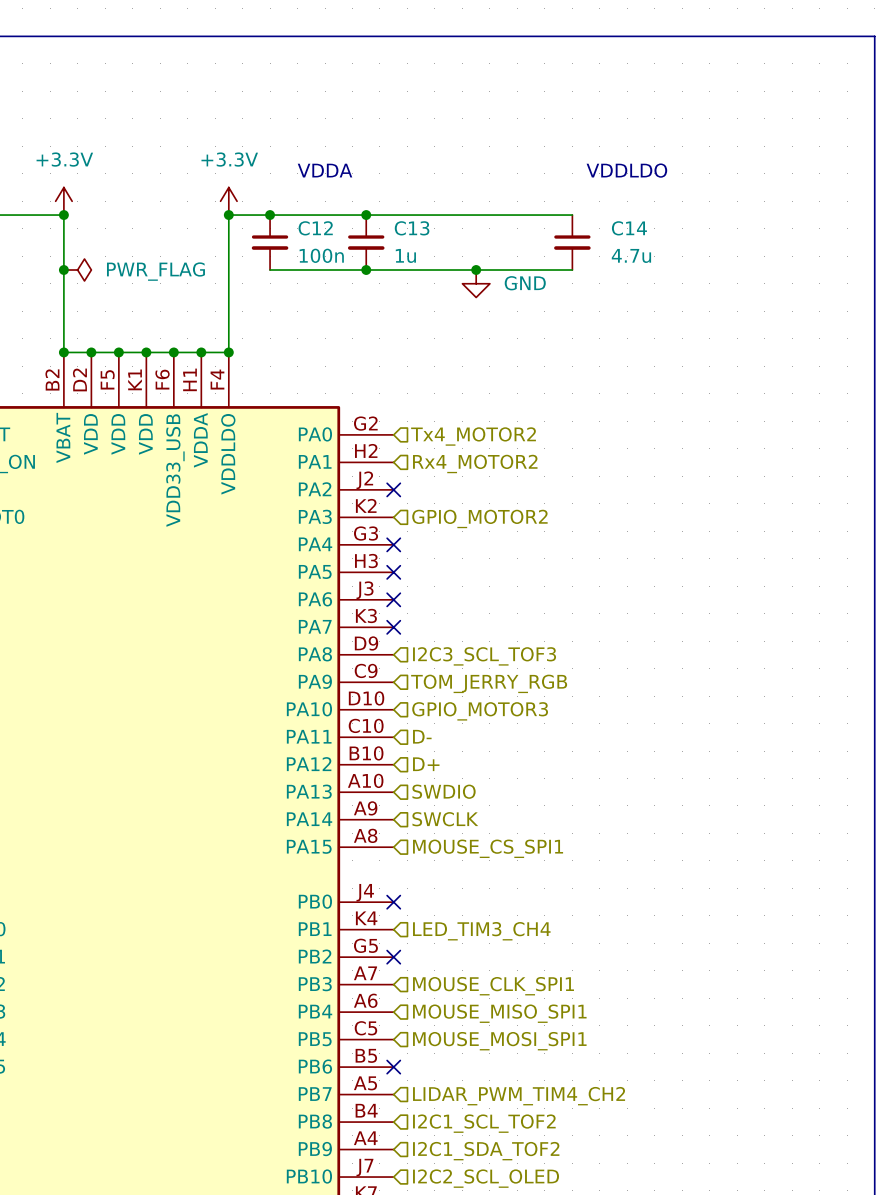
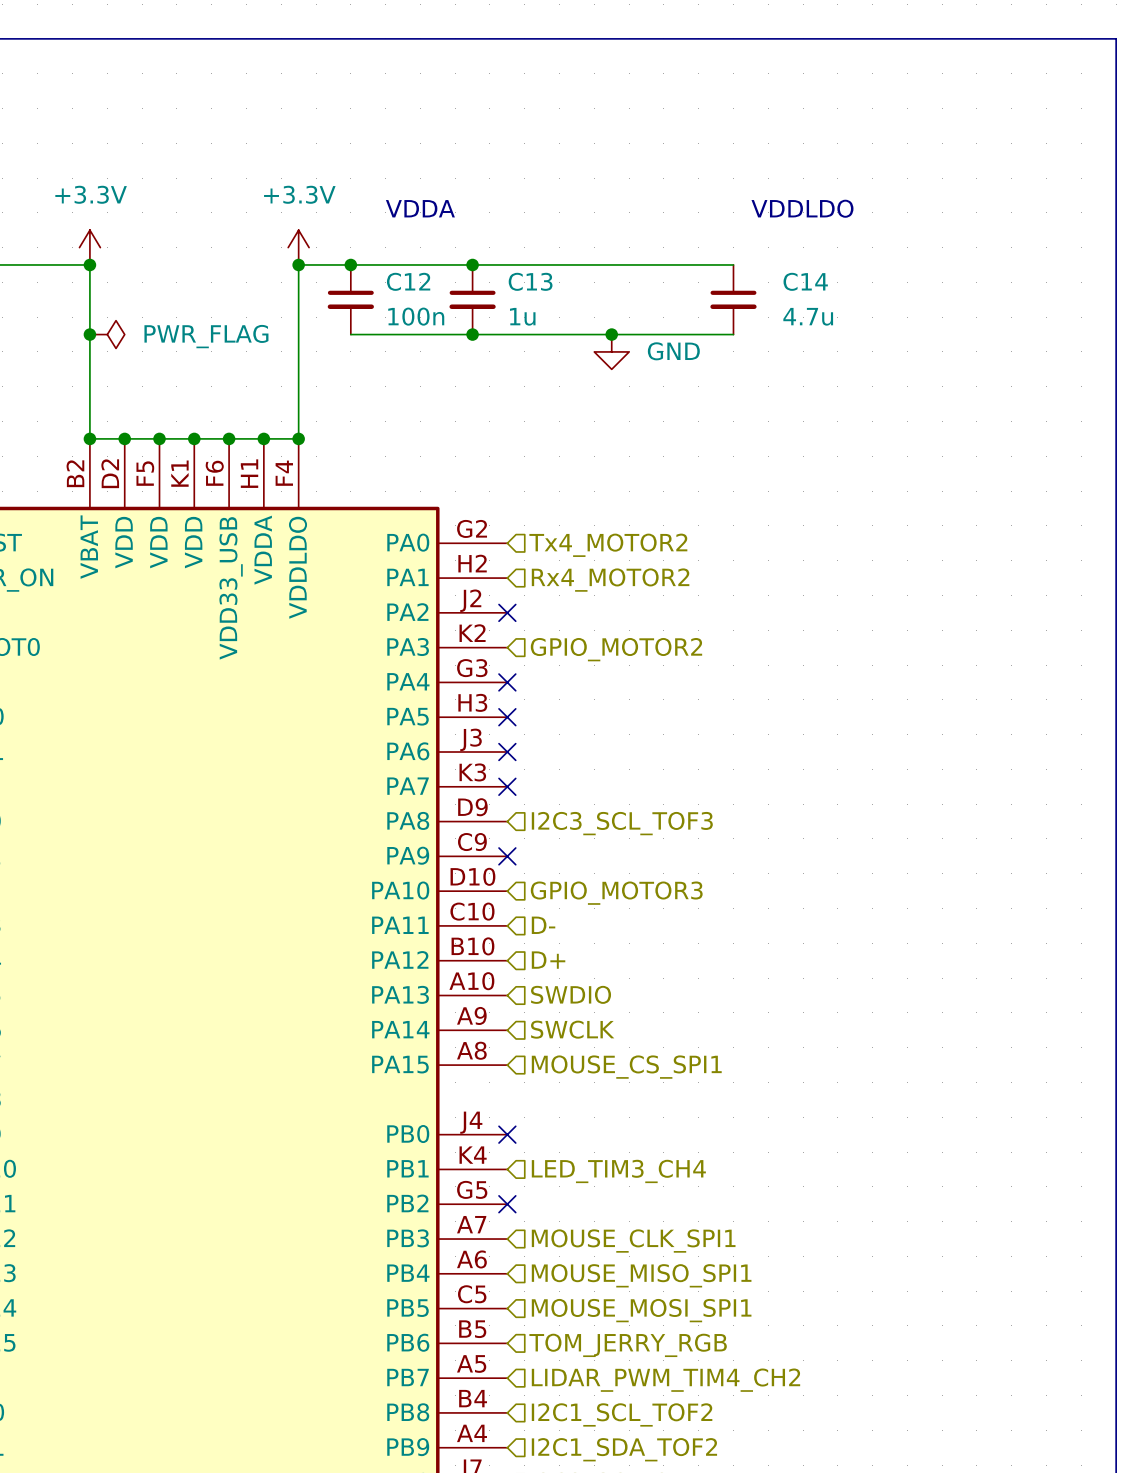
no-connect mark: none -> (507, 856)
hierarchical label: TOM_JERRY_RGB (489, 683) -> none
no-connect mark: (393, 1067) -> none
hierarchical label: none -> TOM_JERRY_RGB (628, 1345)

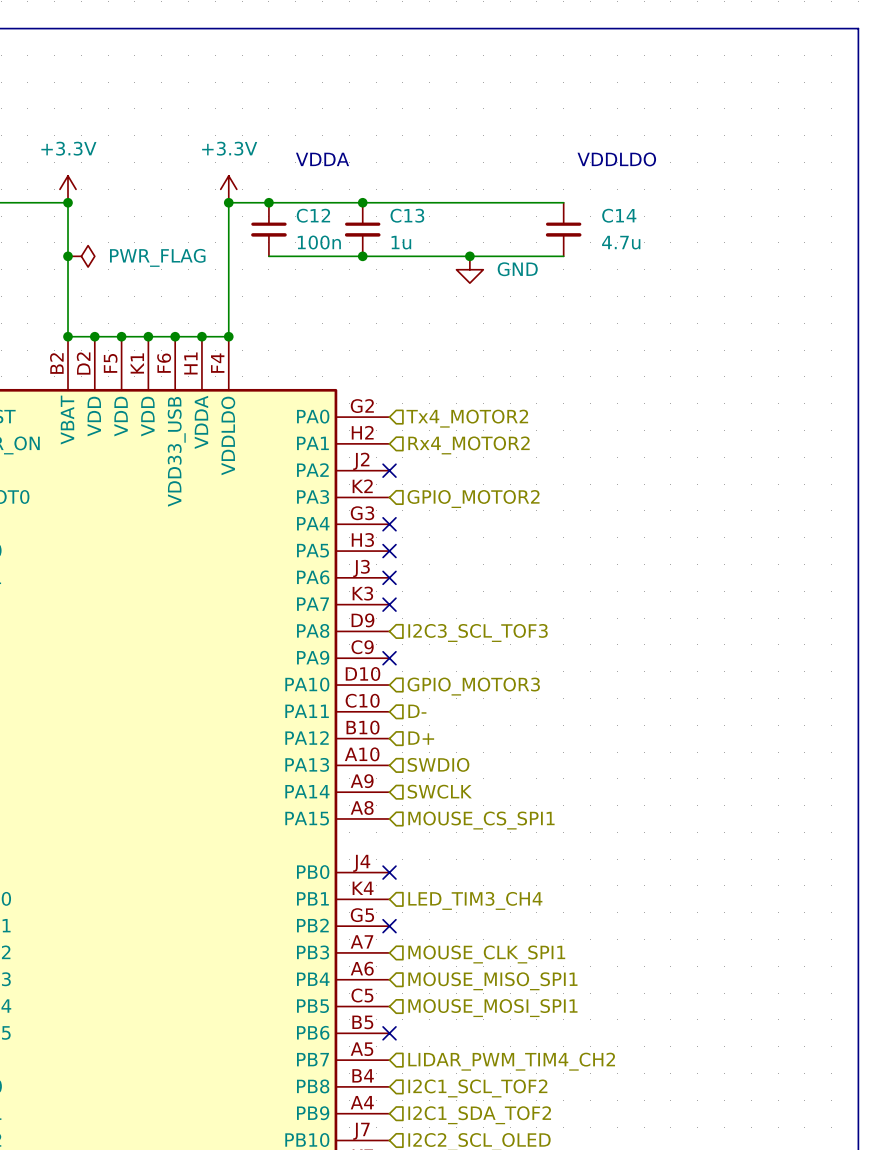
no-connect mark: none -> (389, 1033)
hierarchical label: TOM_JERRY_RGB (628, 1345) -> none

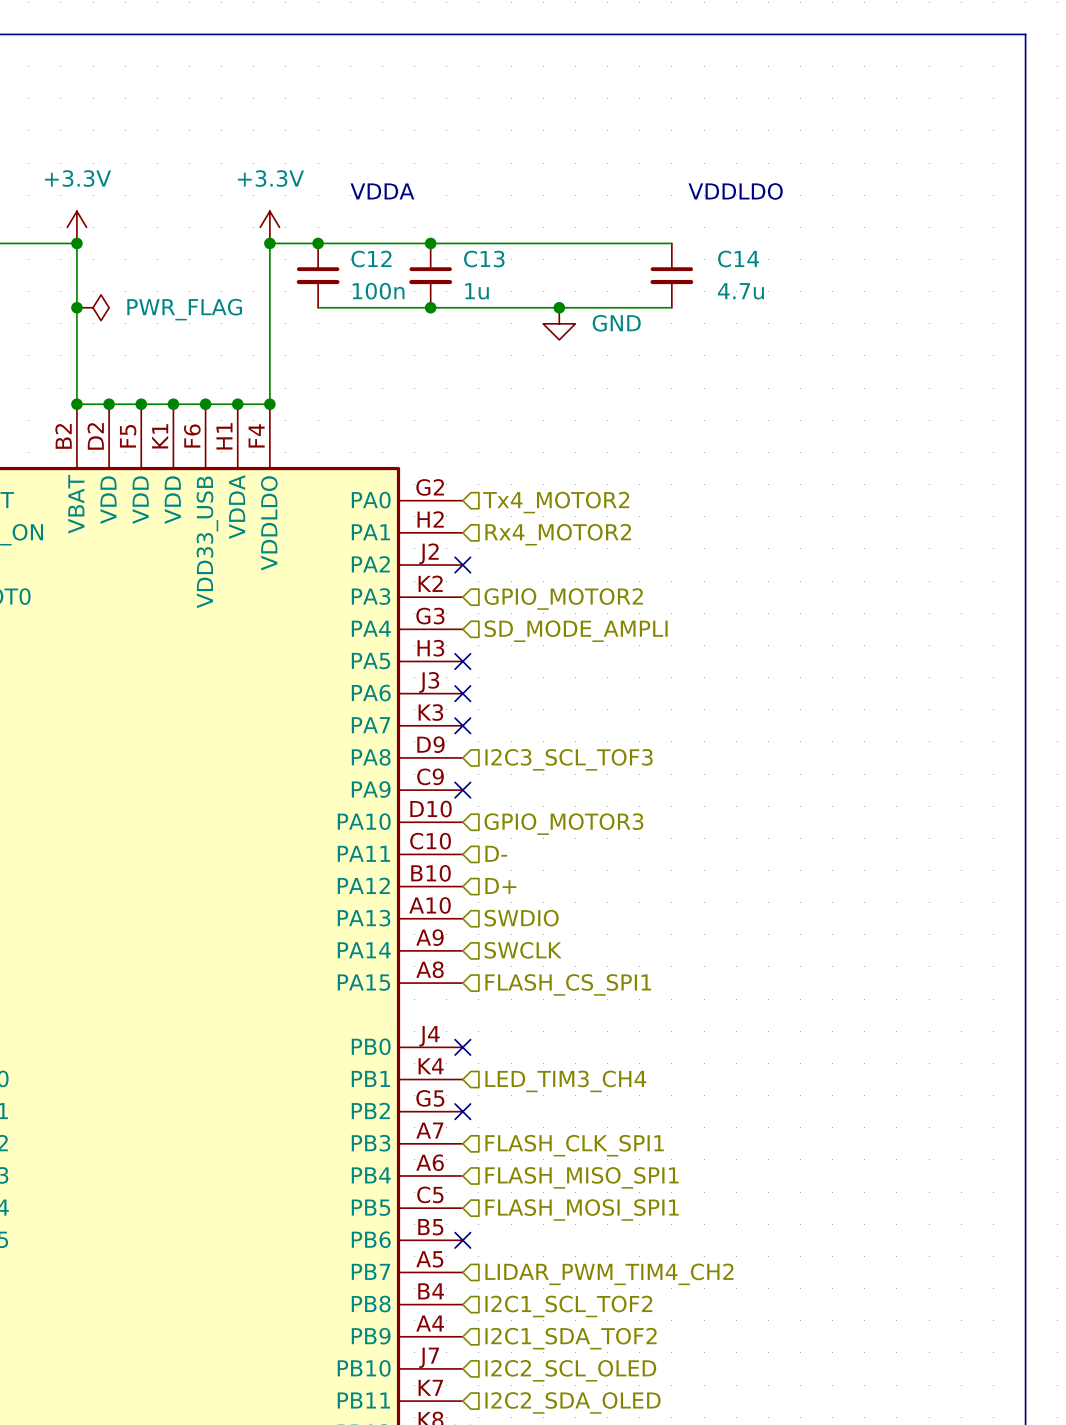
no-connect mark: (389, 524) -> none
hierarchical label: none -> SD_MODE_AMPLI (576, 631)
hierarchical label: MOUSE_CS_SPI1 (481, 820) -> FLASH_CS_SPI1 (568, 984)
hierarchical label: MOUSE_CLK_SPI1 (486, 954) -> FLASH_CLK_SPI1 (574, 1145)
hierarchical label: MOUSE_MISO_SPI1 (492, 981) -> FLASH_MISO_SPI1 (582, 1177)
hierarchical label: MOUSE_MOSI_SPI1 (492, 1008) -> FLASH_MOSI_SPI1 (582, 1210)

